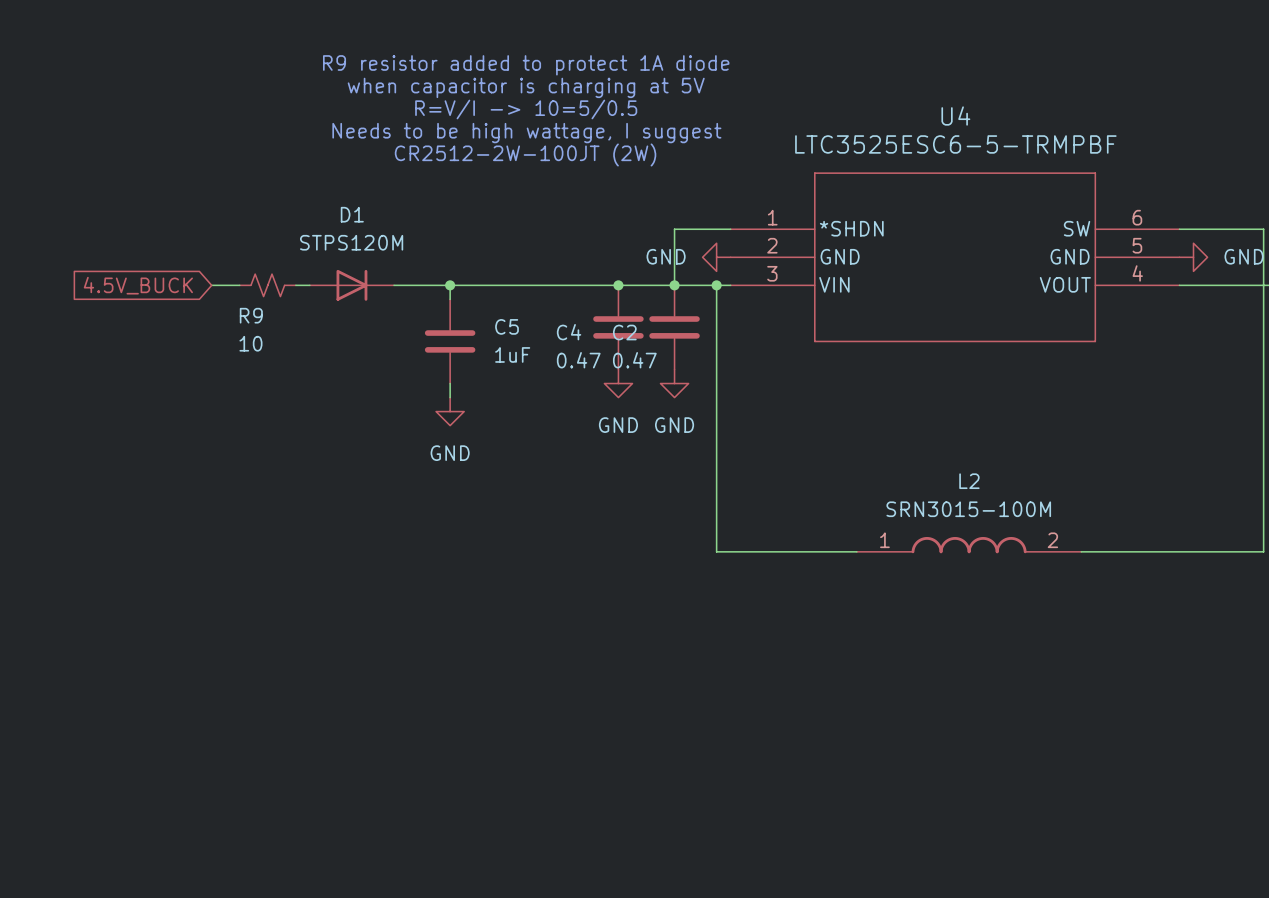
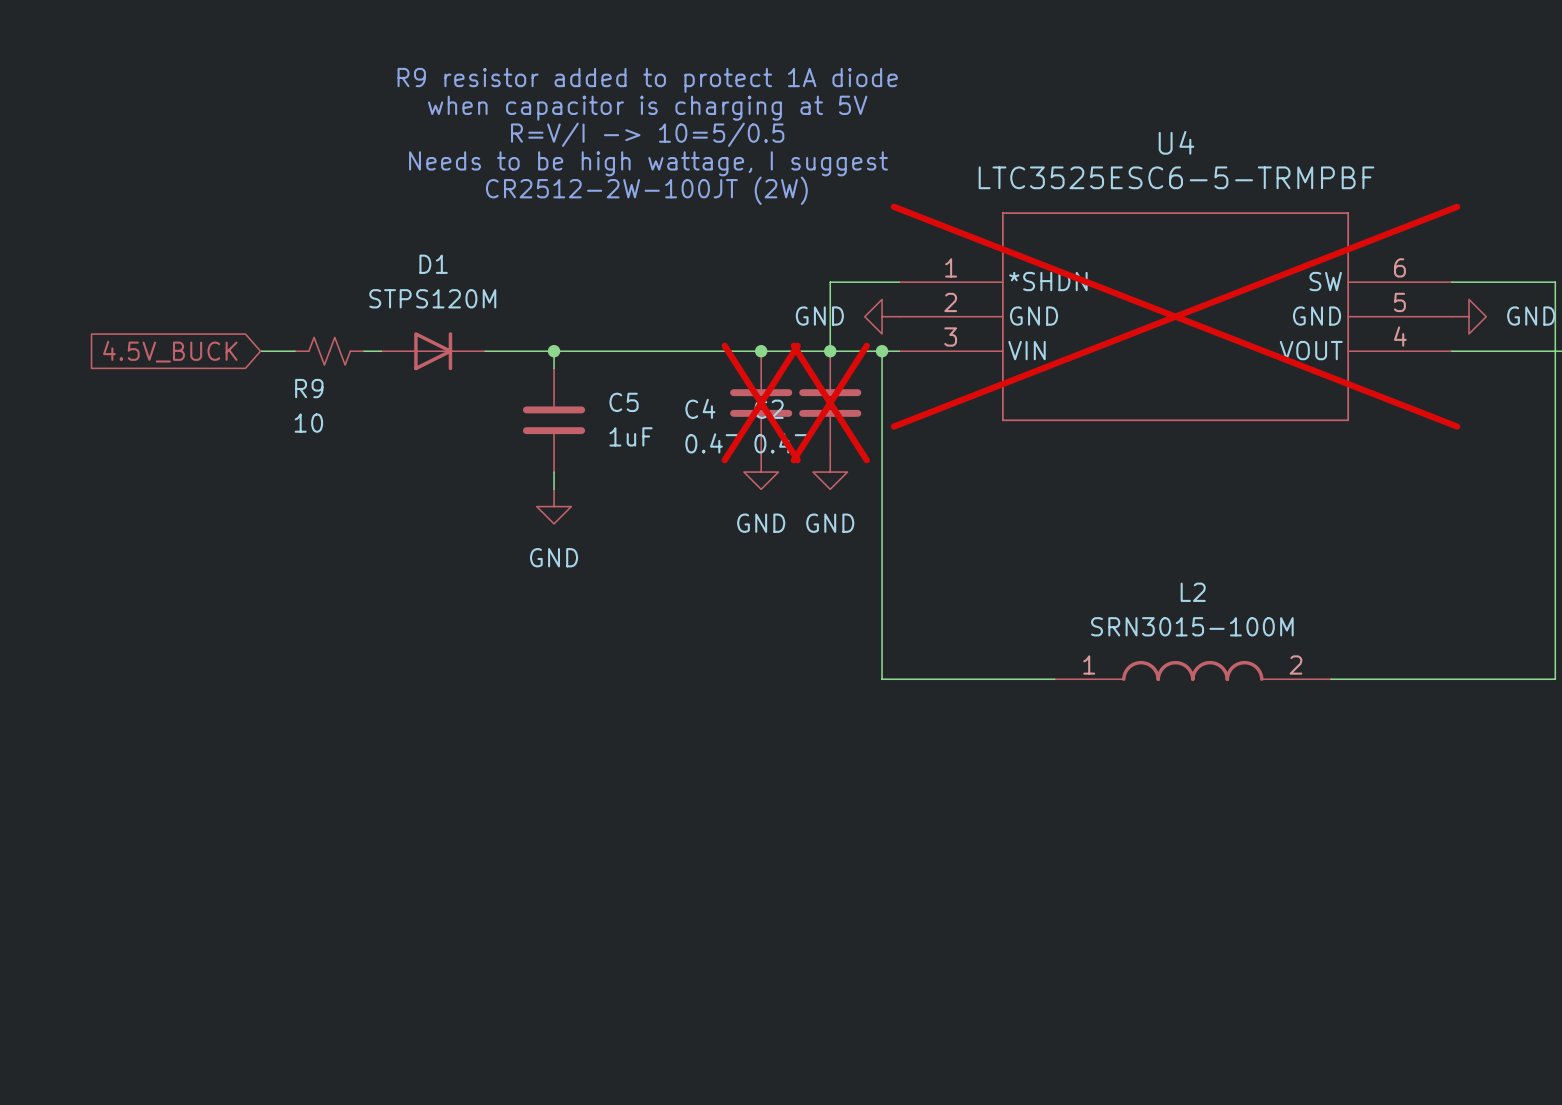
U4 do-not-place cross: none -> (1175, 316)
C4 do-not-place cross: none -> (761, 403)
C2 do-not-place cross: none -> (830, 403)

